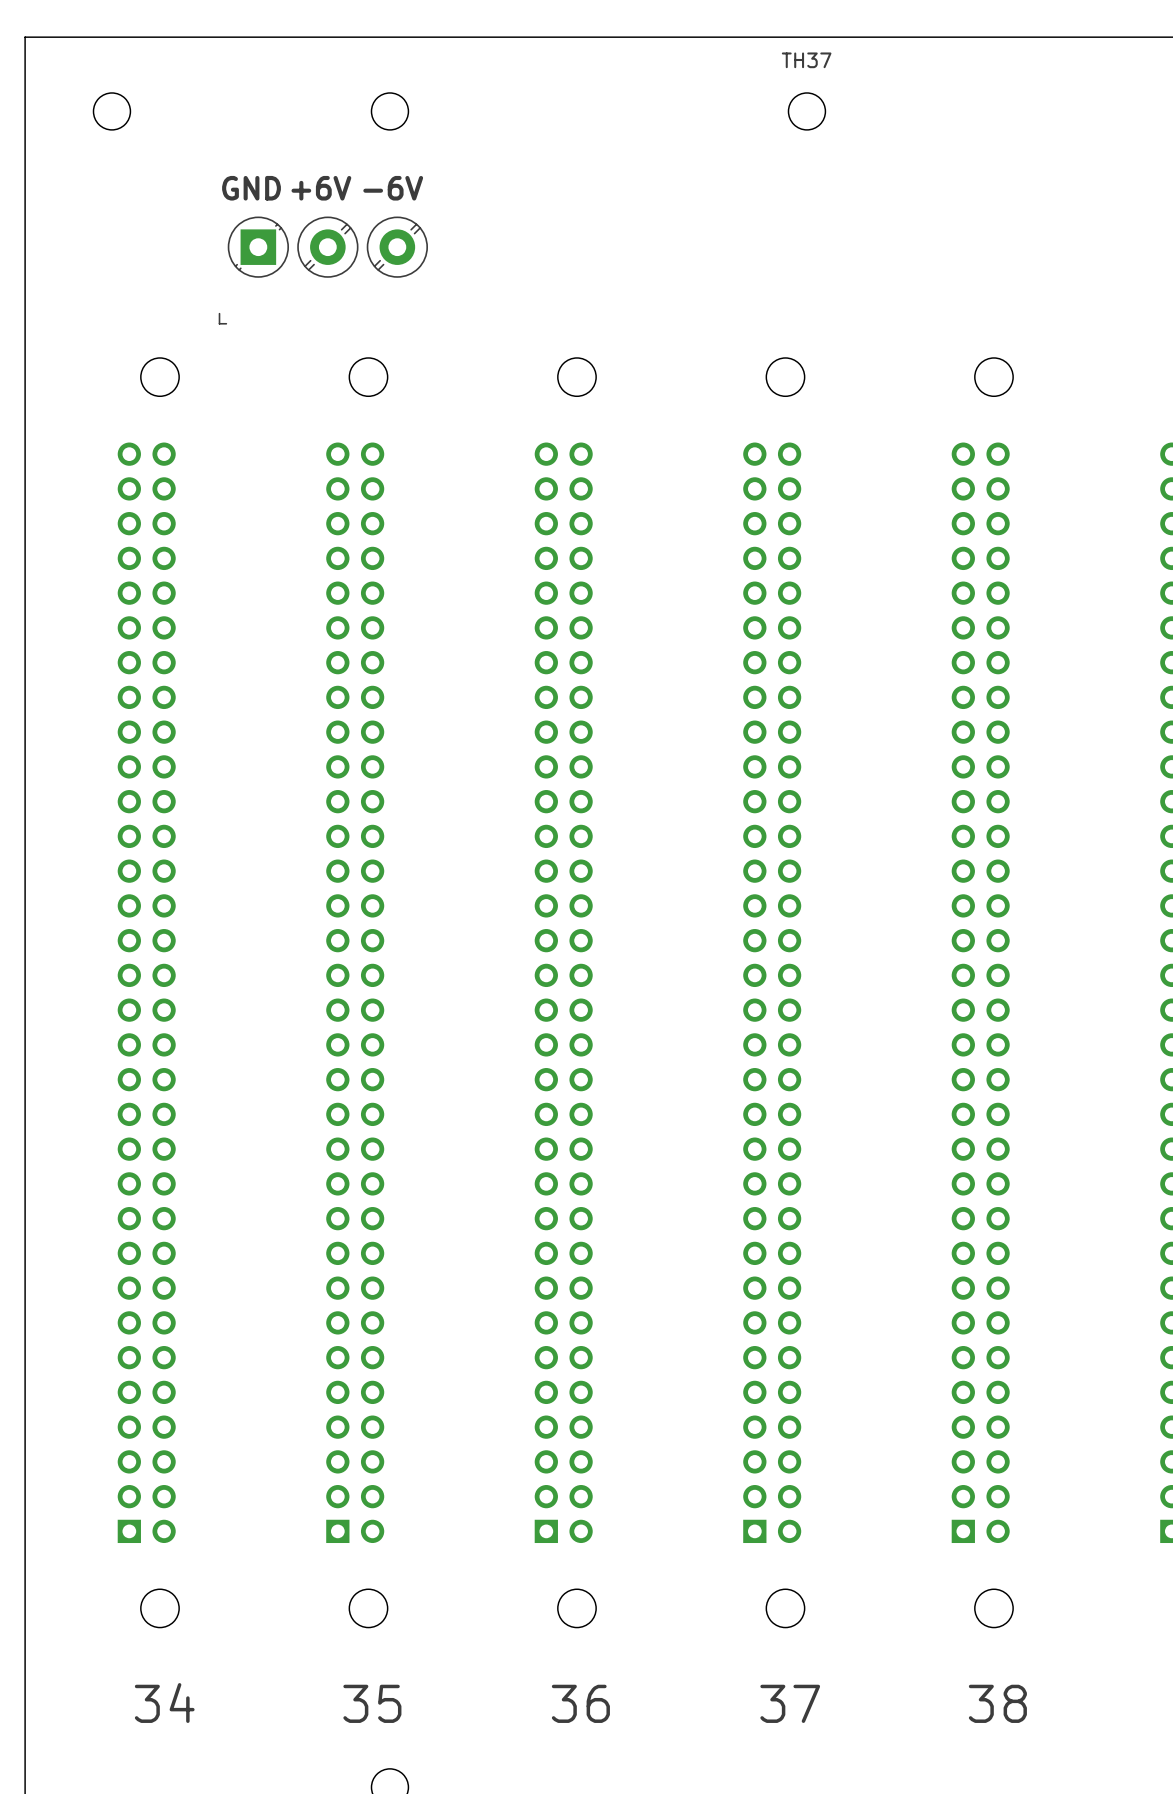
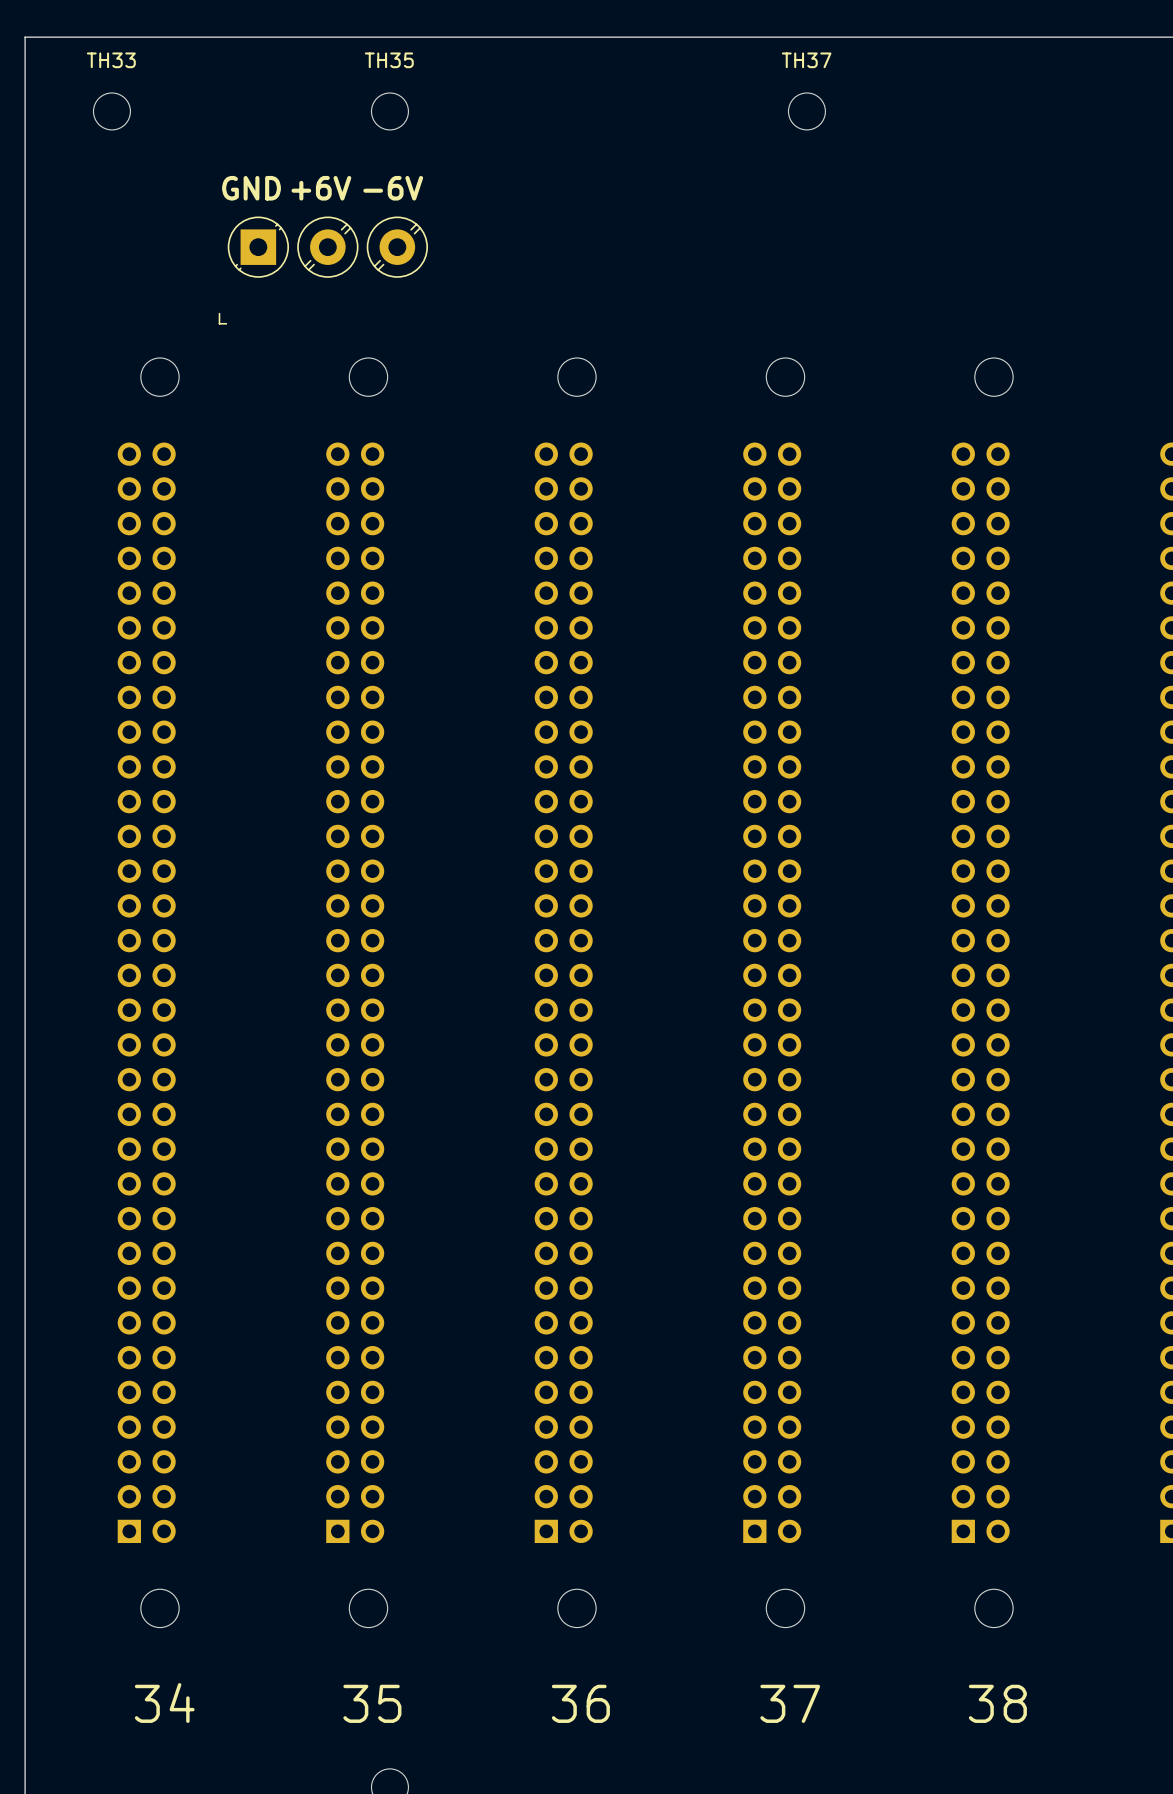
TH33 name: none -> TH33 (111, 60)
TH35 name: none -> TH35 (389, 60)

